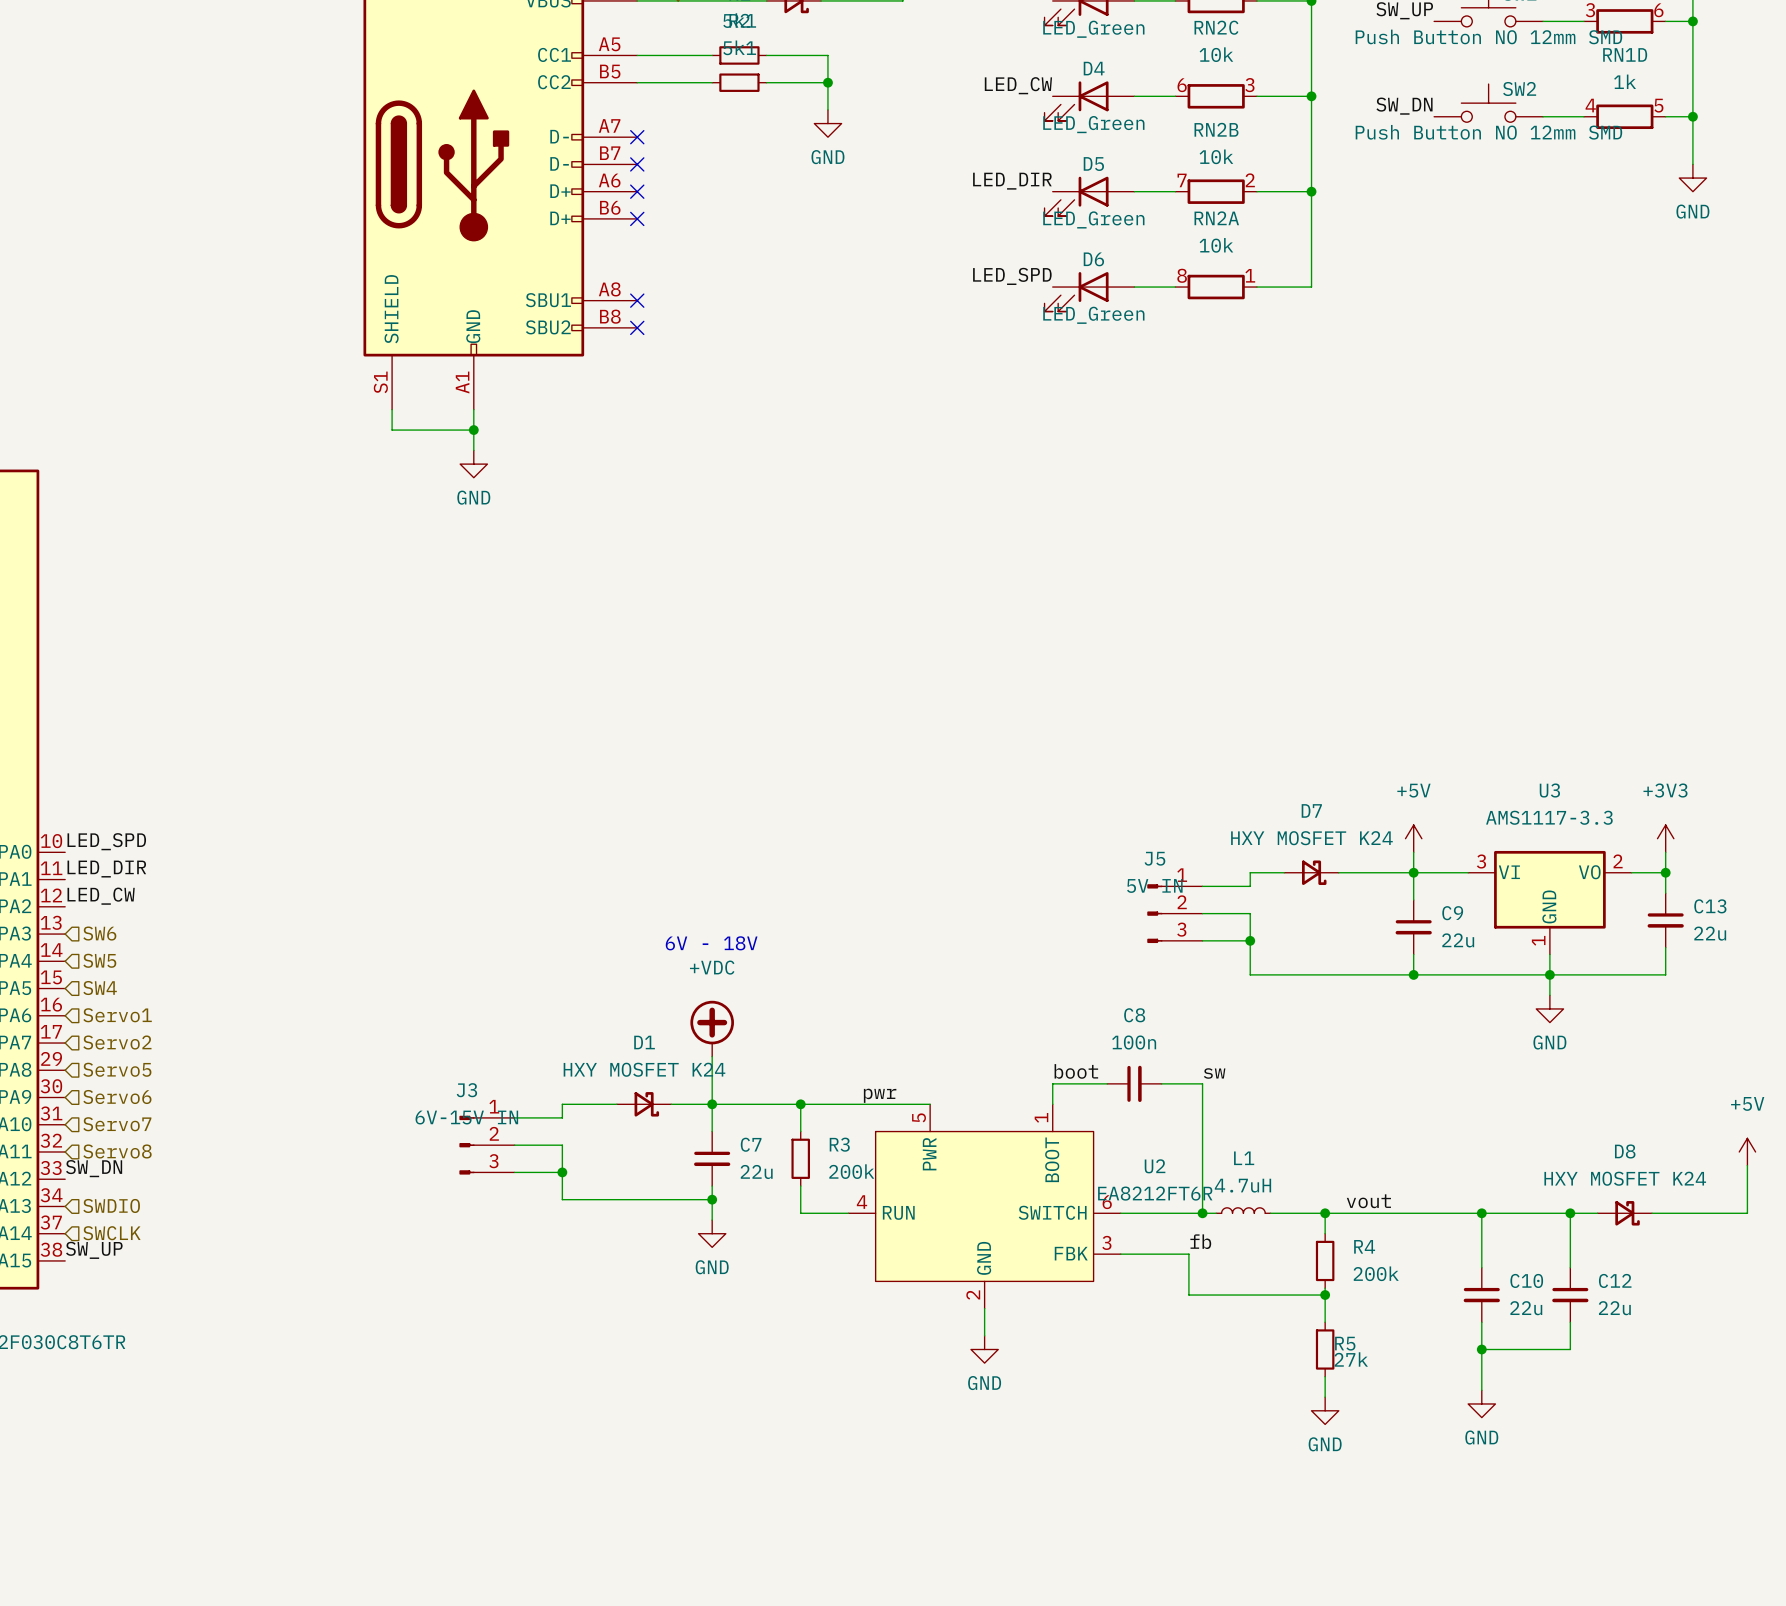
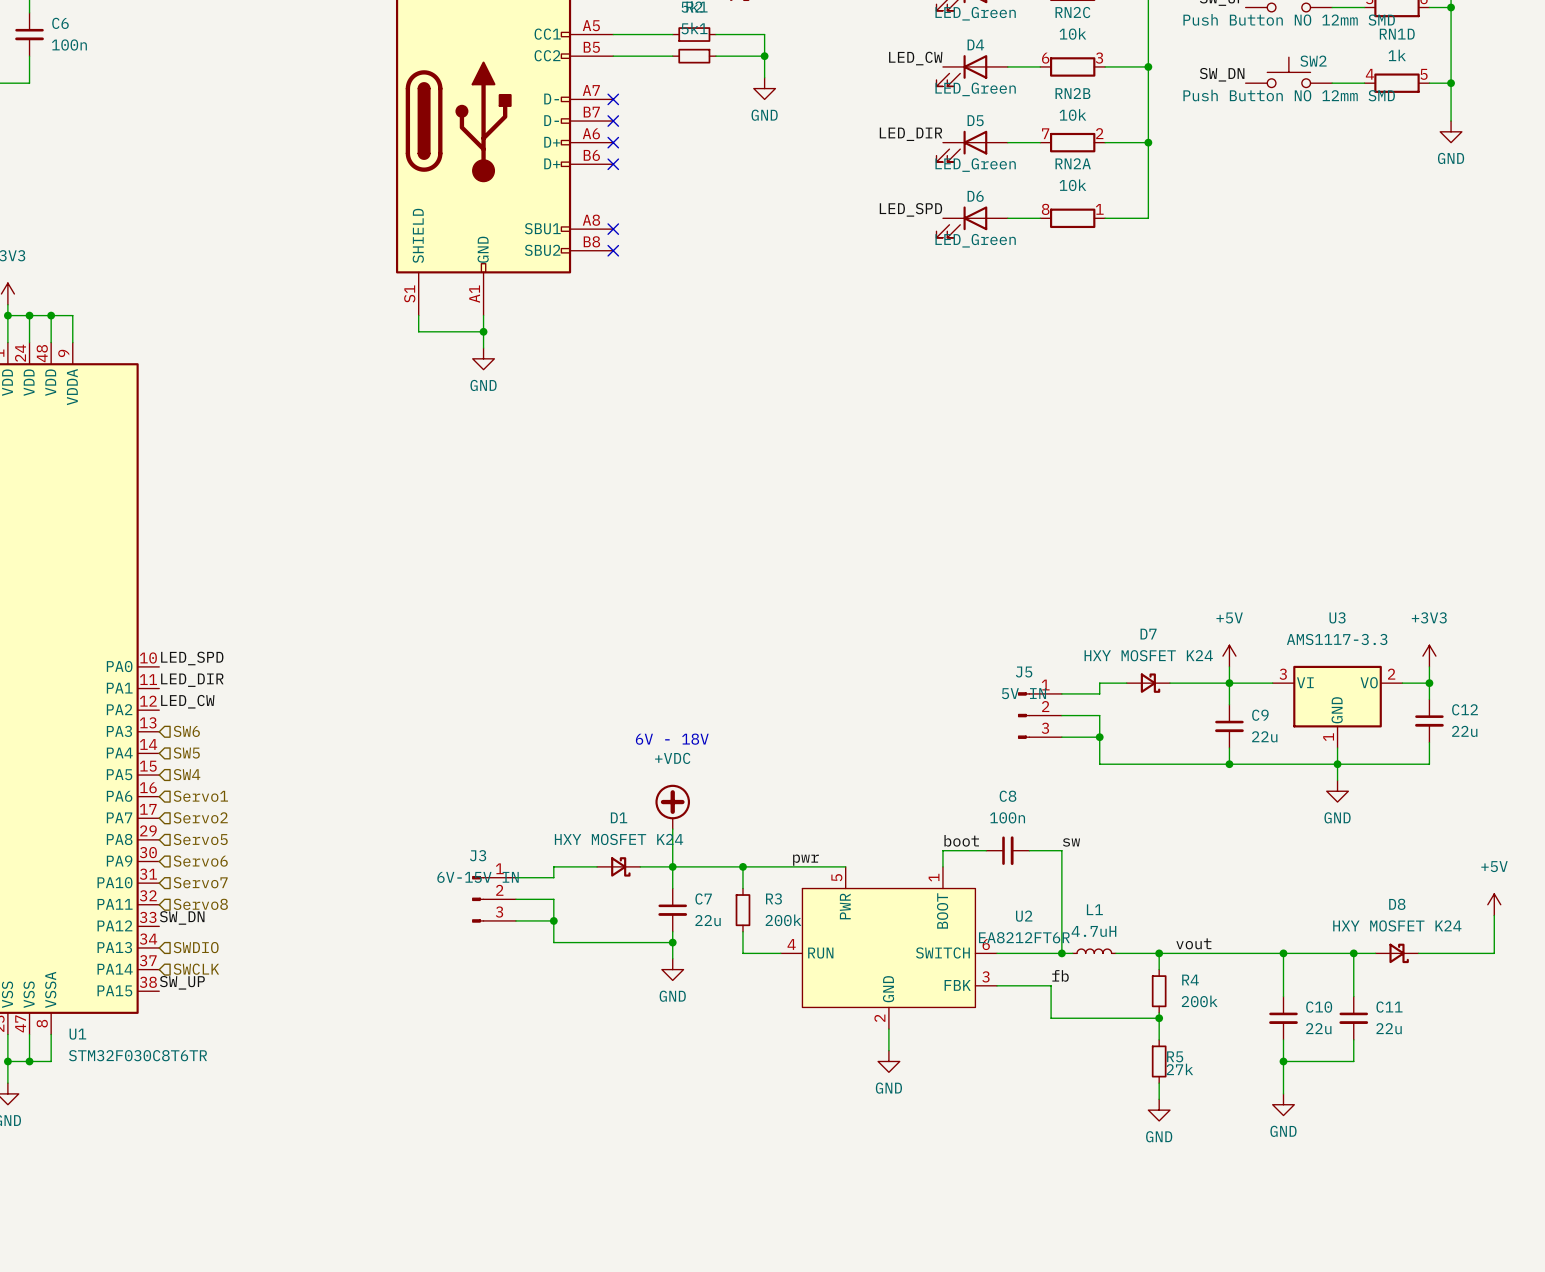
C13 name: C13 (1710, 906) -> C12 (1465, 709)
C12 name: C12 (1615, 1280) -> C11 (1389, 1007)

